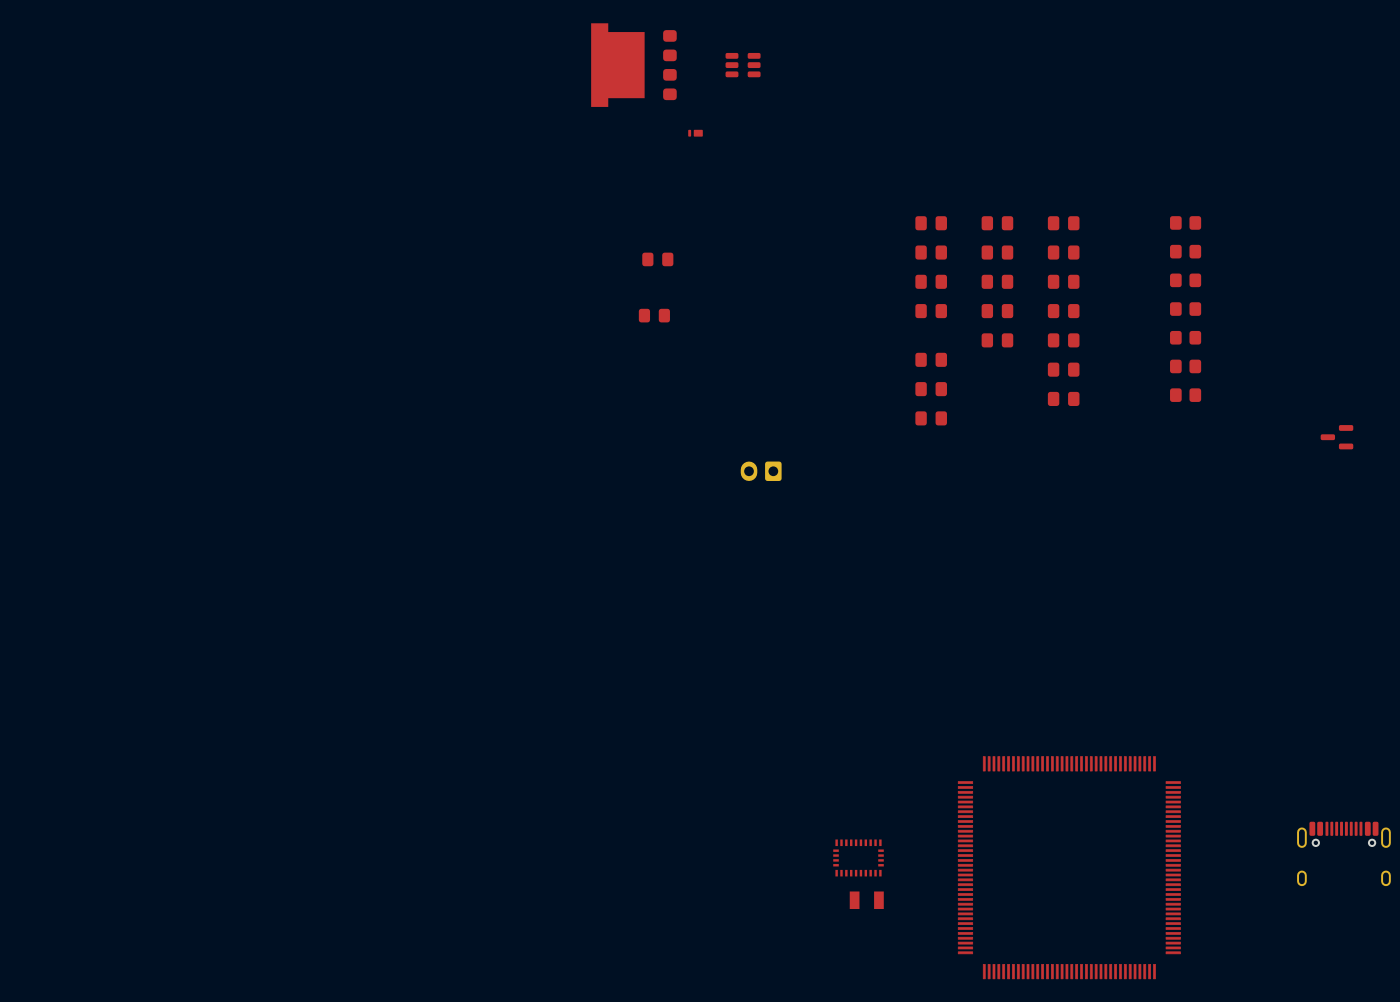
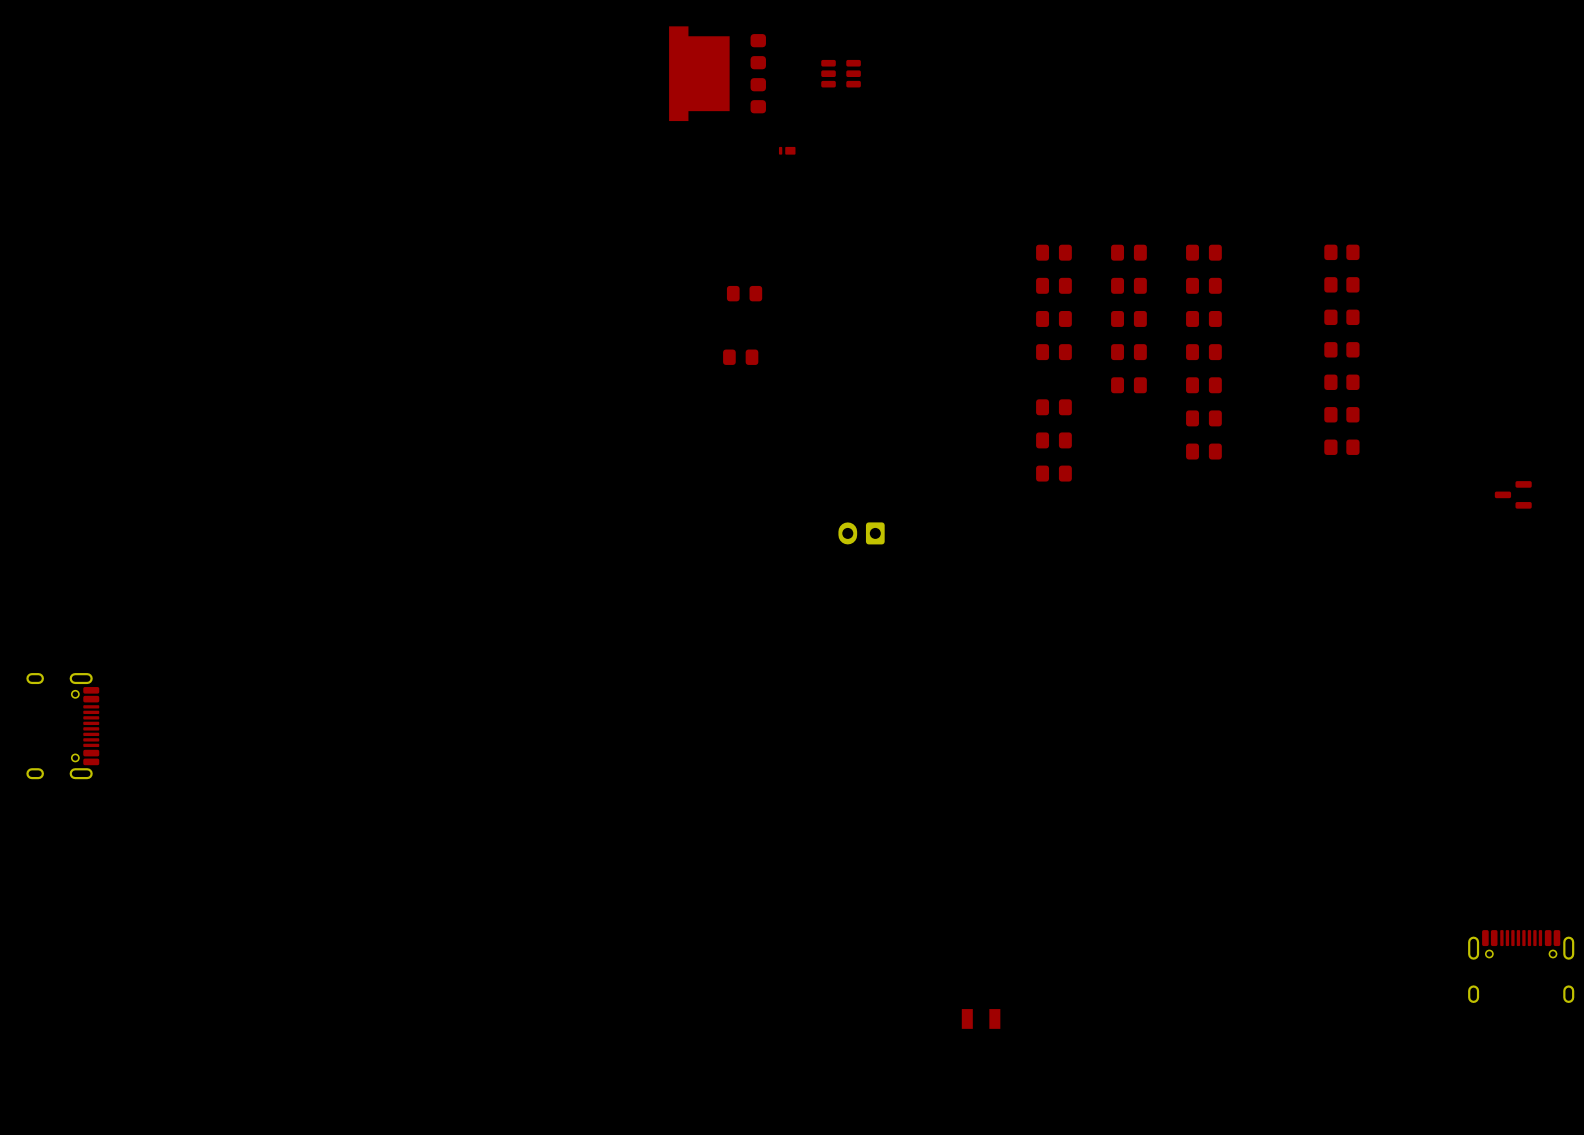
part: none -> (62, 726)
part: (858, 857) -> none
part: (1069, 867) -> none

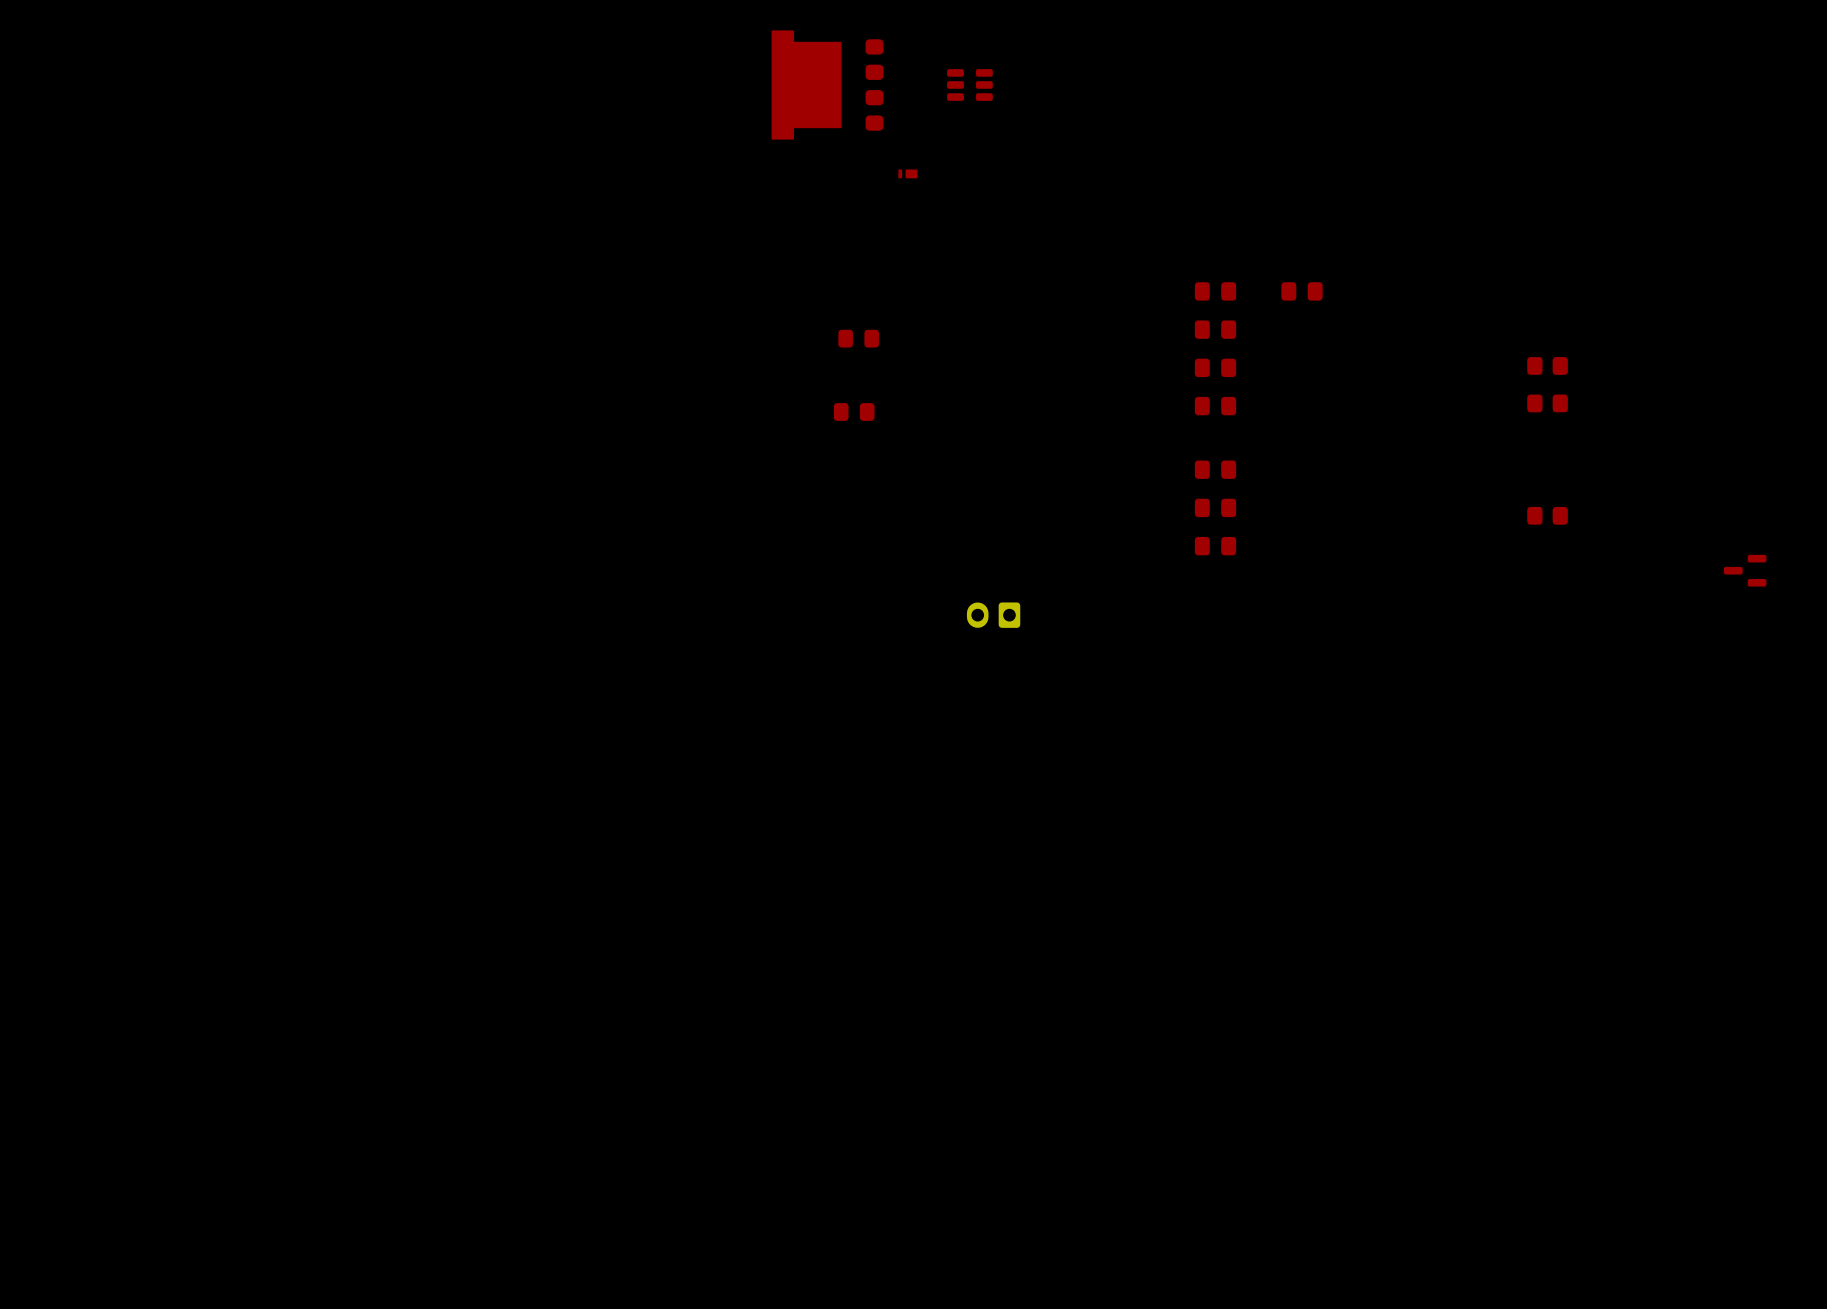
part: (1203, 252) -> none
part: (1341, 252) -> none
part: (1341, 284) -> none
part: (1128, 285) -> none
part: (1203, 285) -> none
part: (1128, 318) -> none
part: (1203, 318) -> none
part: (1128, 352) -> none
part: (1203, 352) -> none
part: (1341, 382) -> none
part: (1128, 385) -> none
part: (1203, 385) -> none
part: (1341, 414) -> none
part: (1203, 418) -> none
part: (1203, 451) -> none
part: (62, 726) -> none
part: (1521, 966) -> none
part: (981, 1018) -> none

